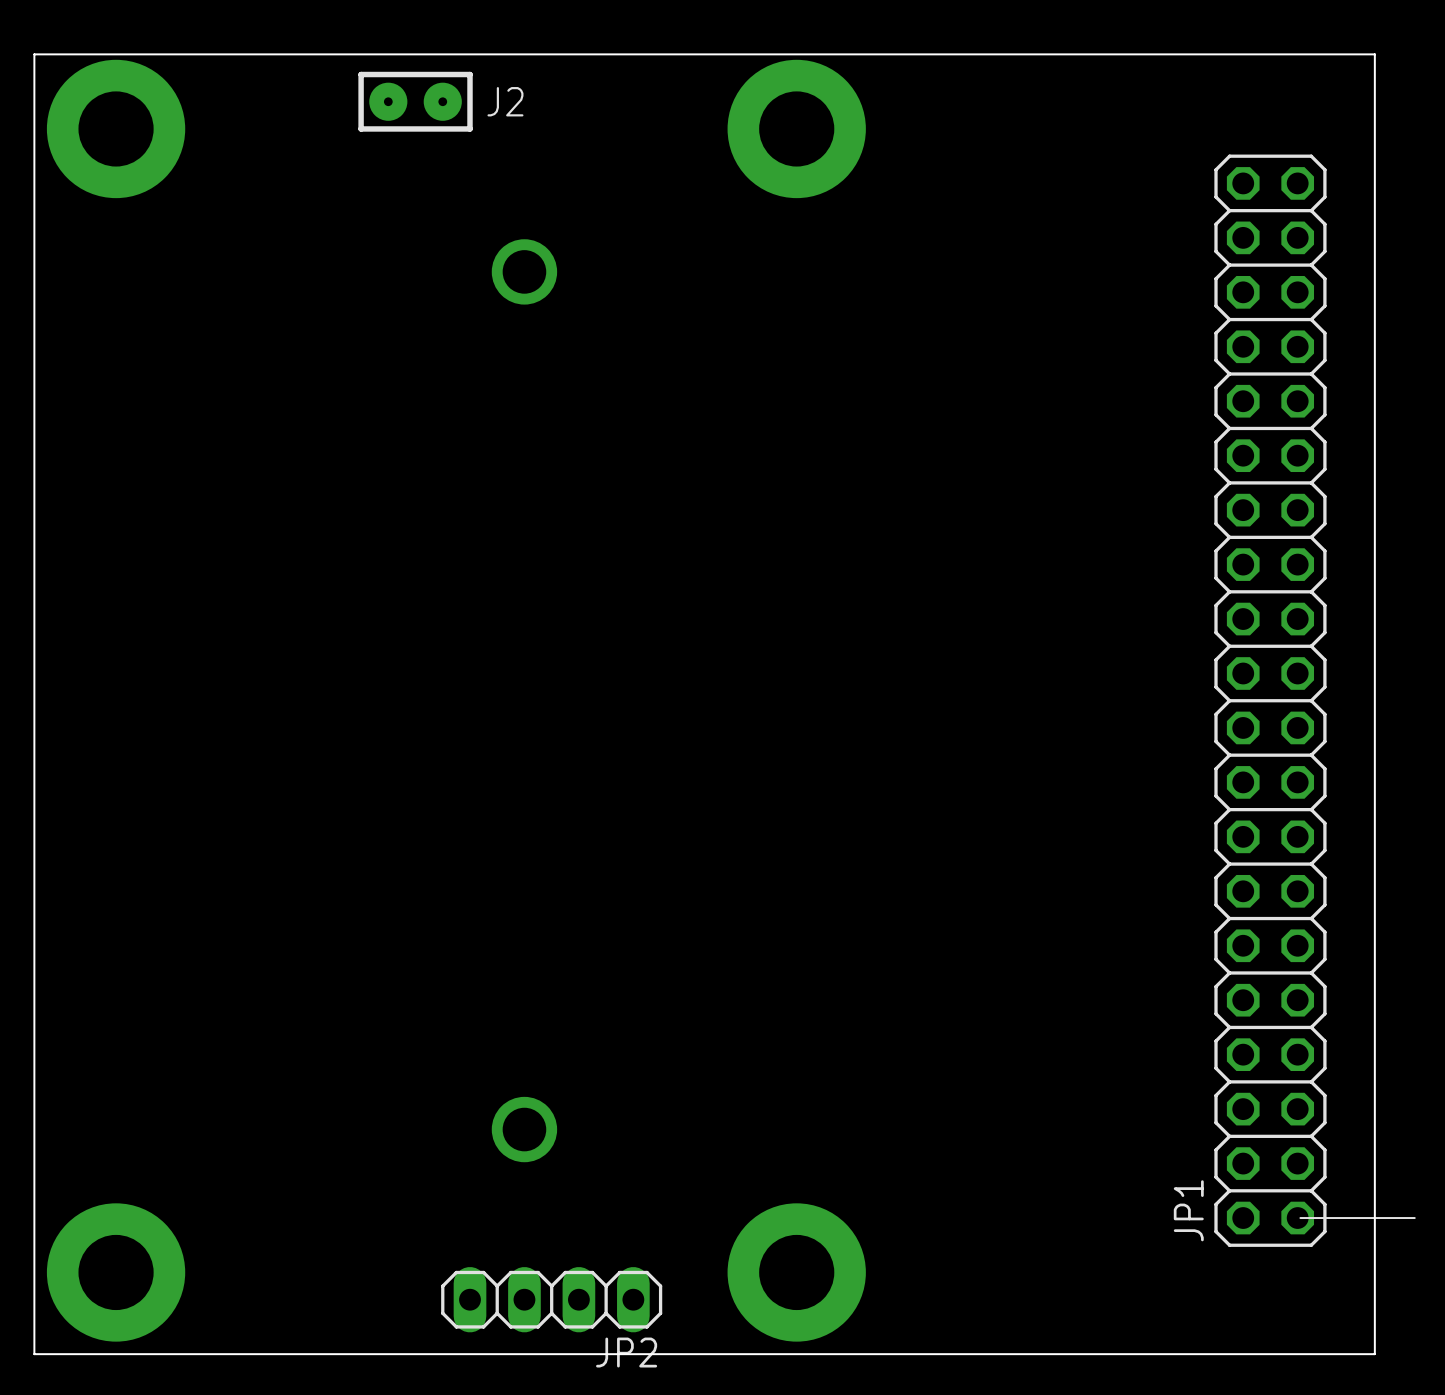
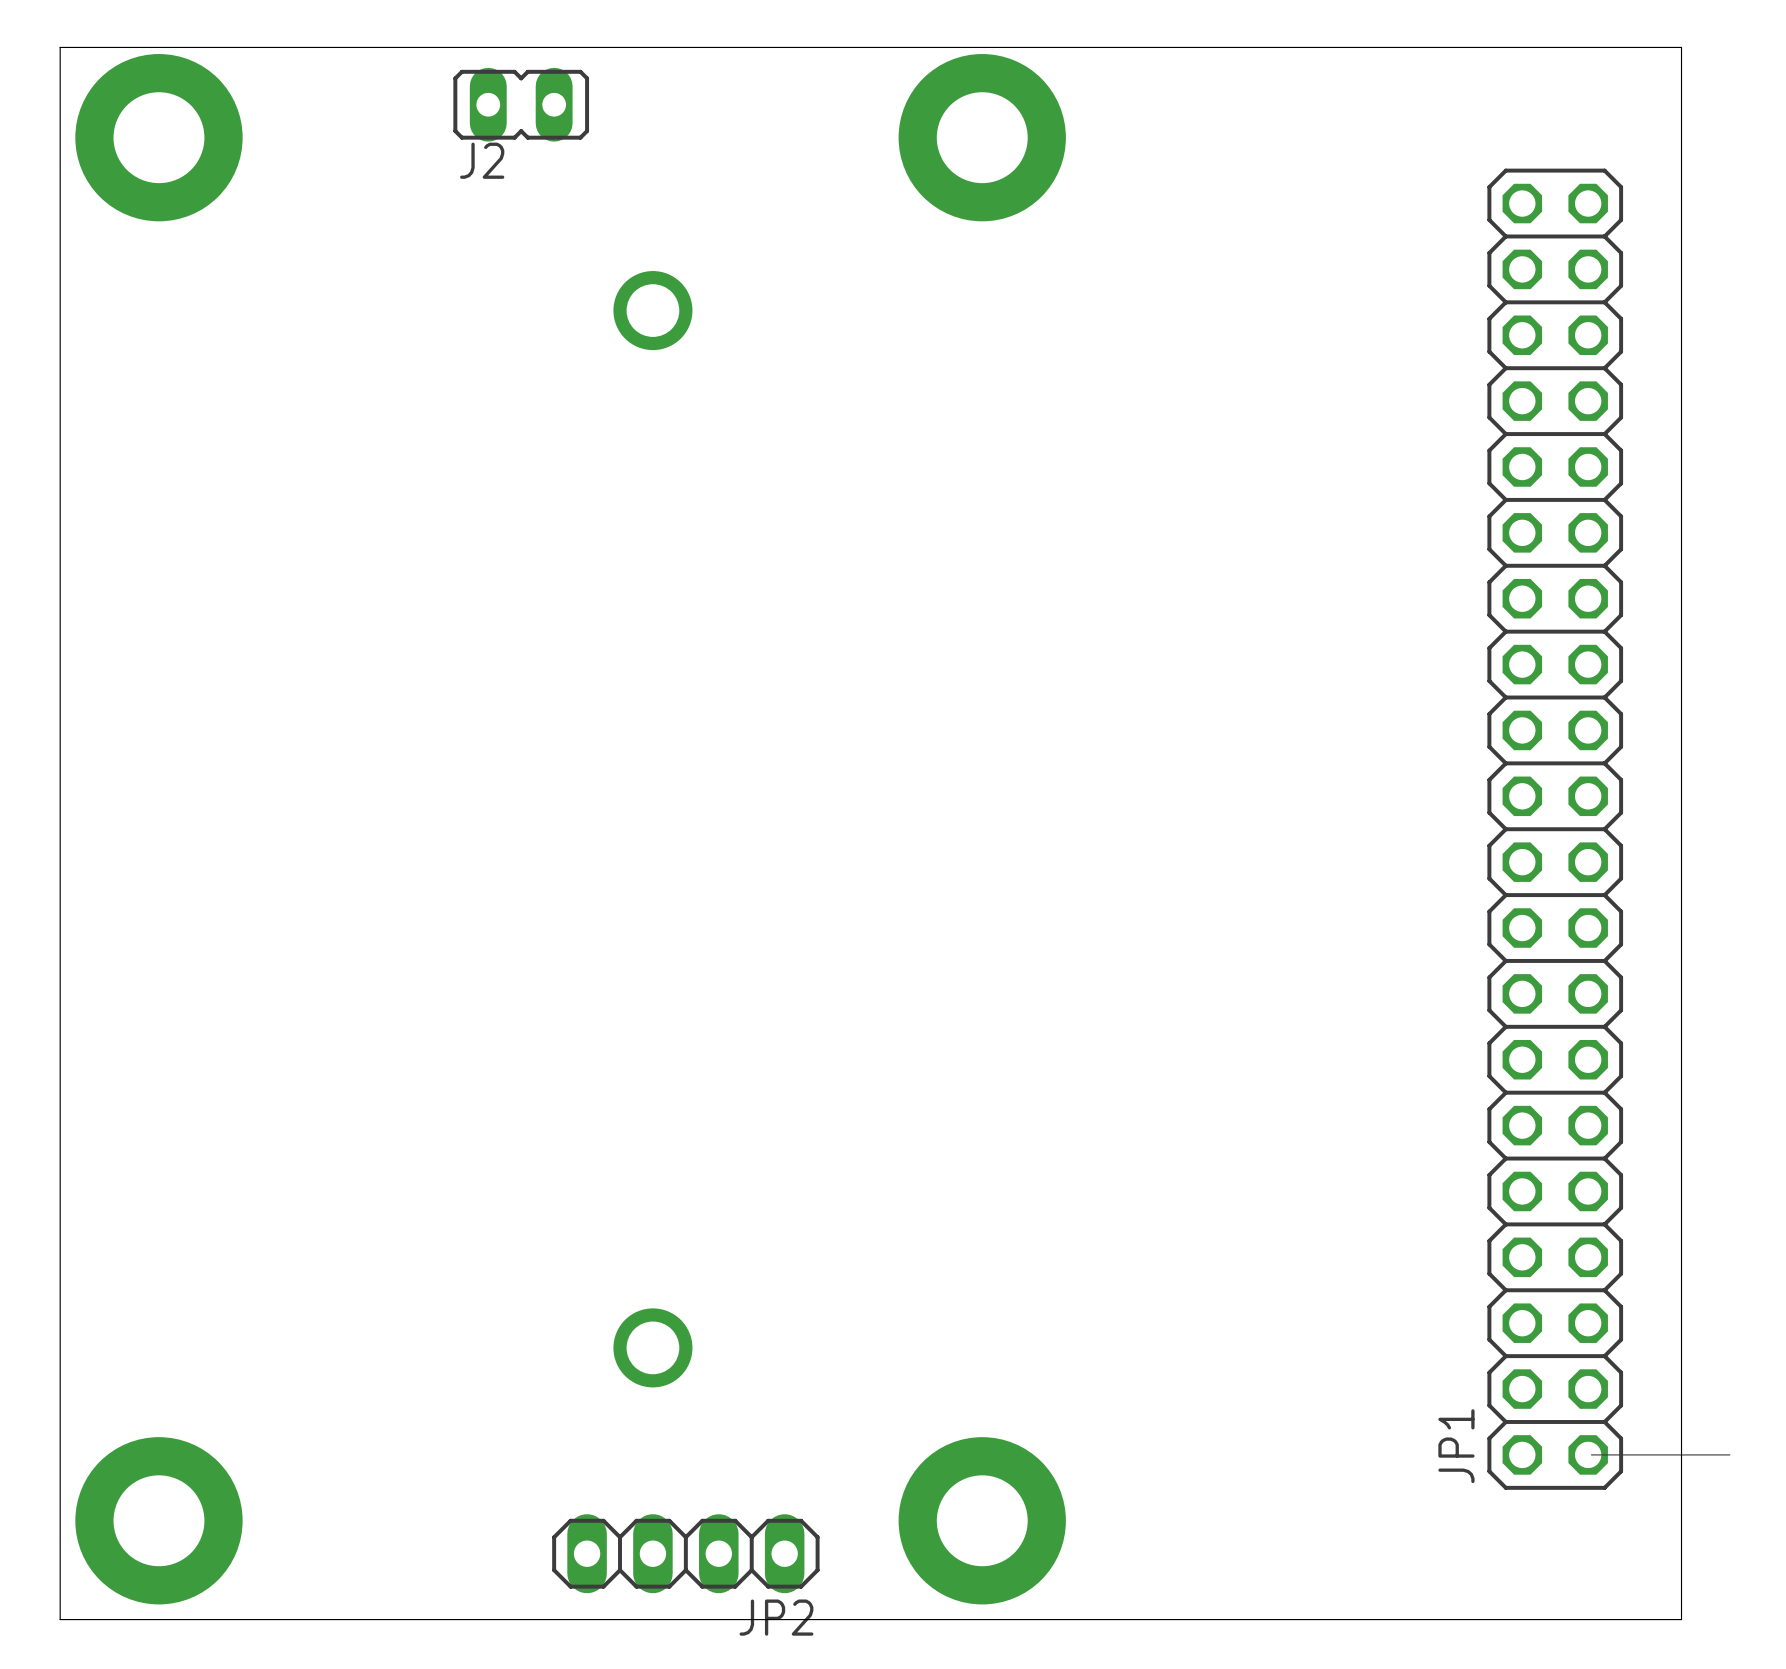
J2 footprint: [358, 71, 473, 132] -> [453, 67, 590, 142]
J2 name position: J2 (505, 101) -> J2 (482, 160)

